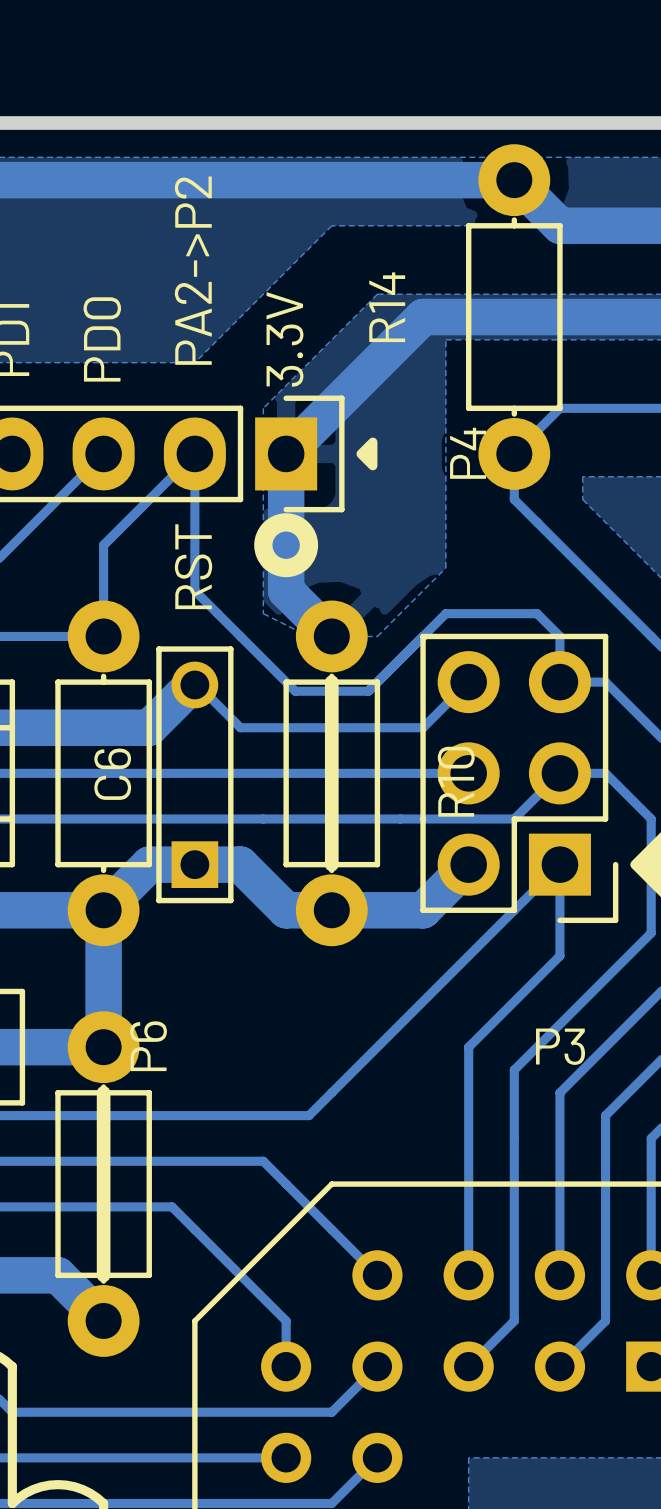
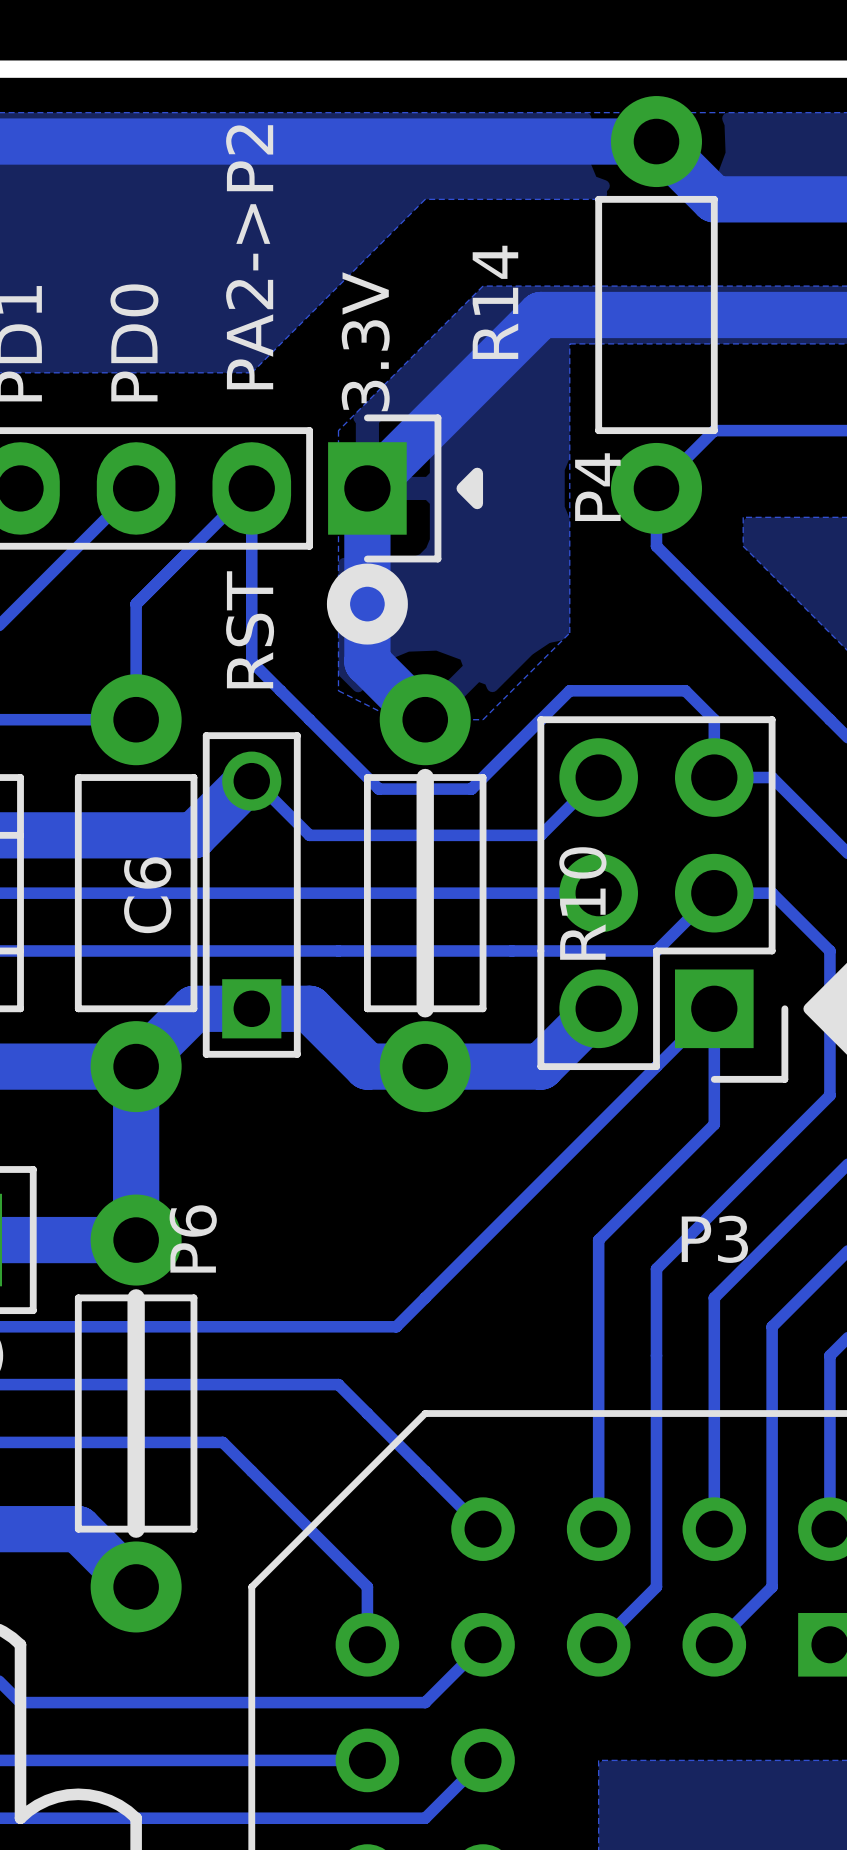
R14 footprint: [465, 144, 563, 490] -> [595, 96, 718, 534]
part footprint: [55, 600, 152, 947] -> [74, 674, 198, 1113]
R10 footprint: [283, 600, 381, 947] -> [363, 674, 487, 1113]
part footprint: [55, 1011, 152, 1357] -> [74, 1194, 198, 1633]

